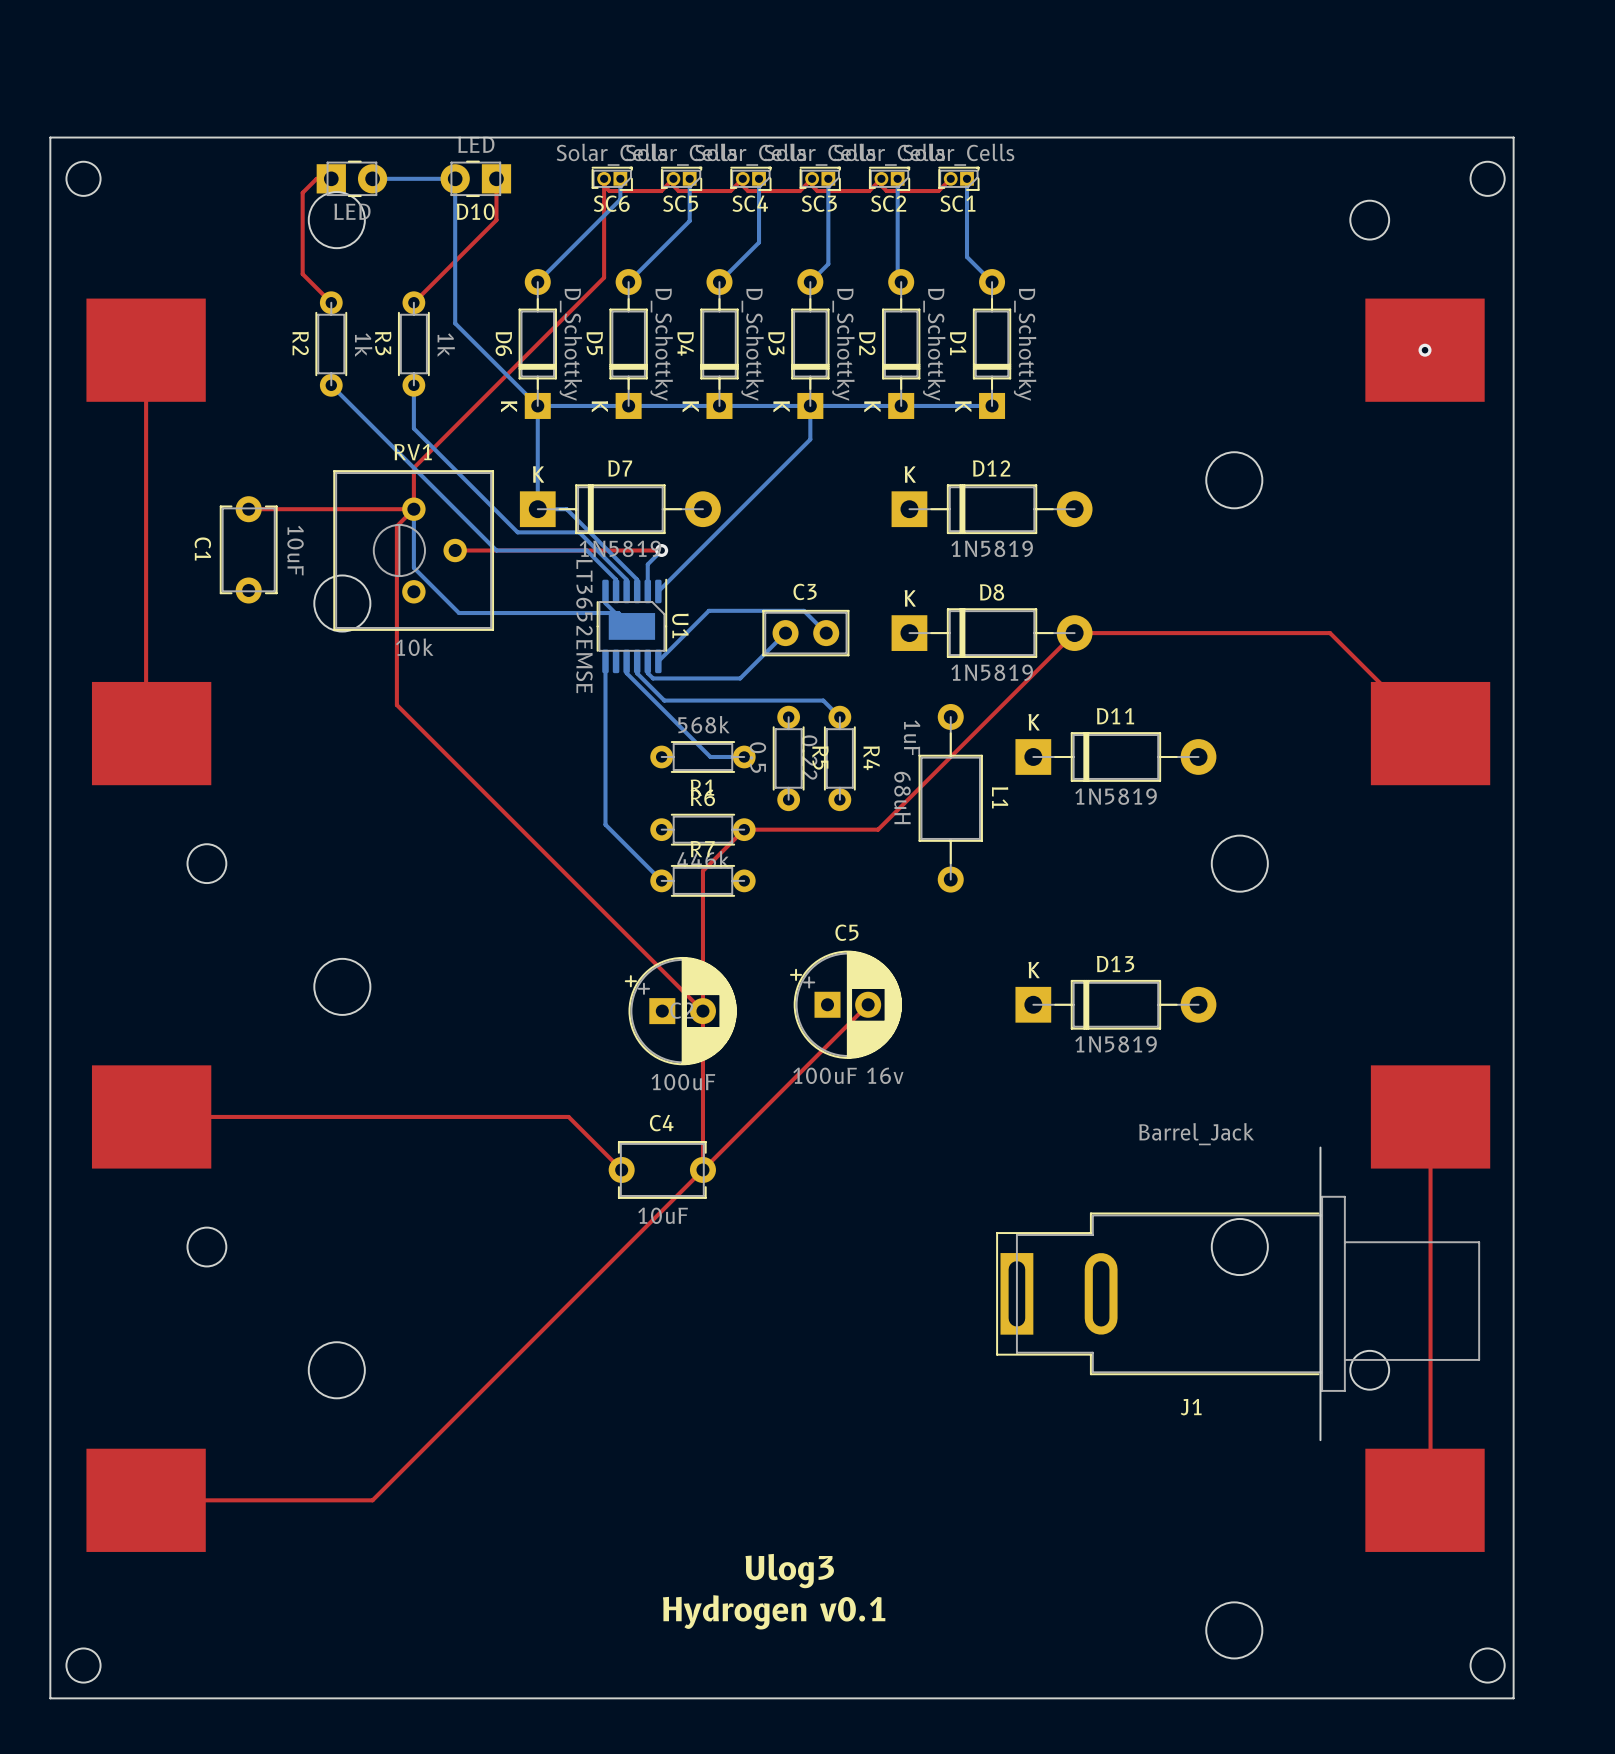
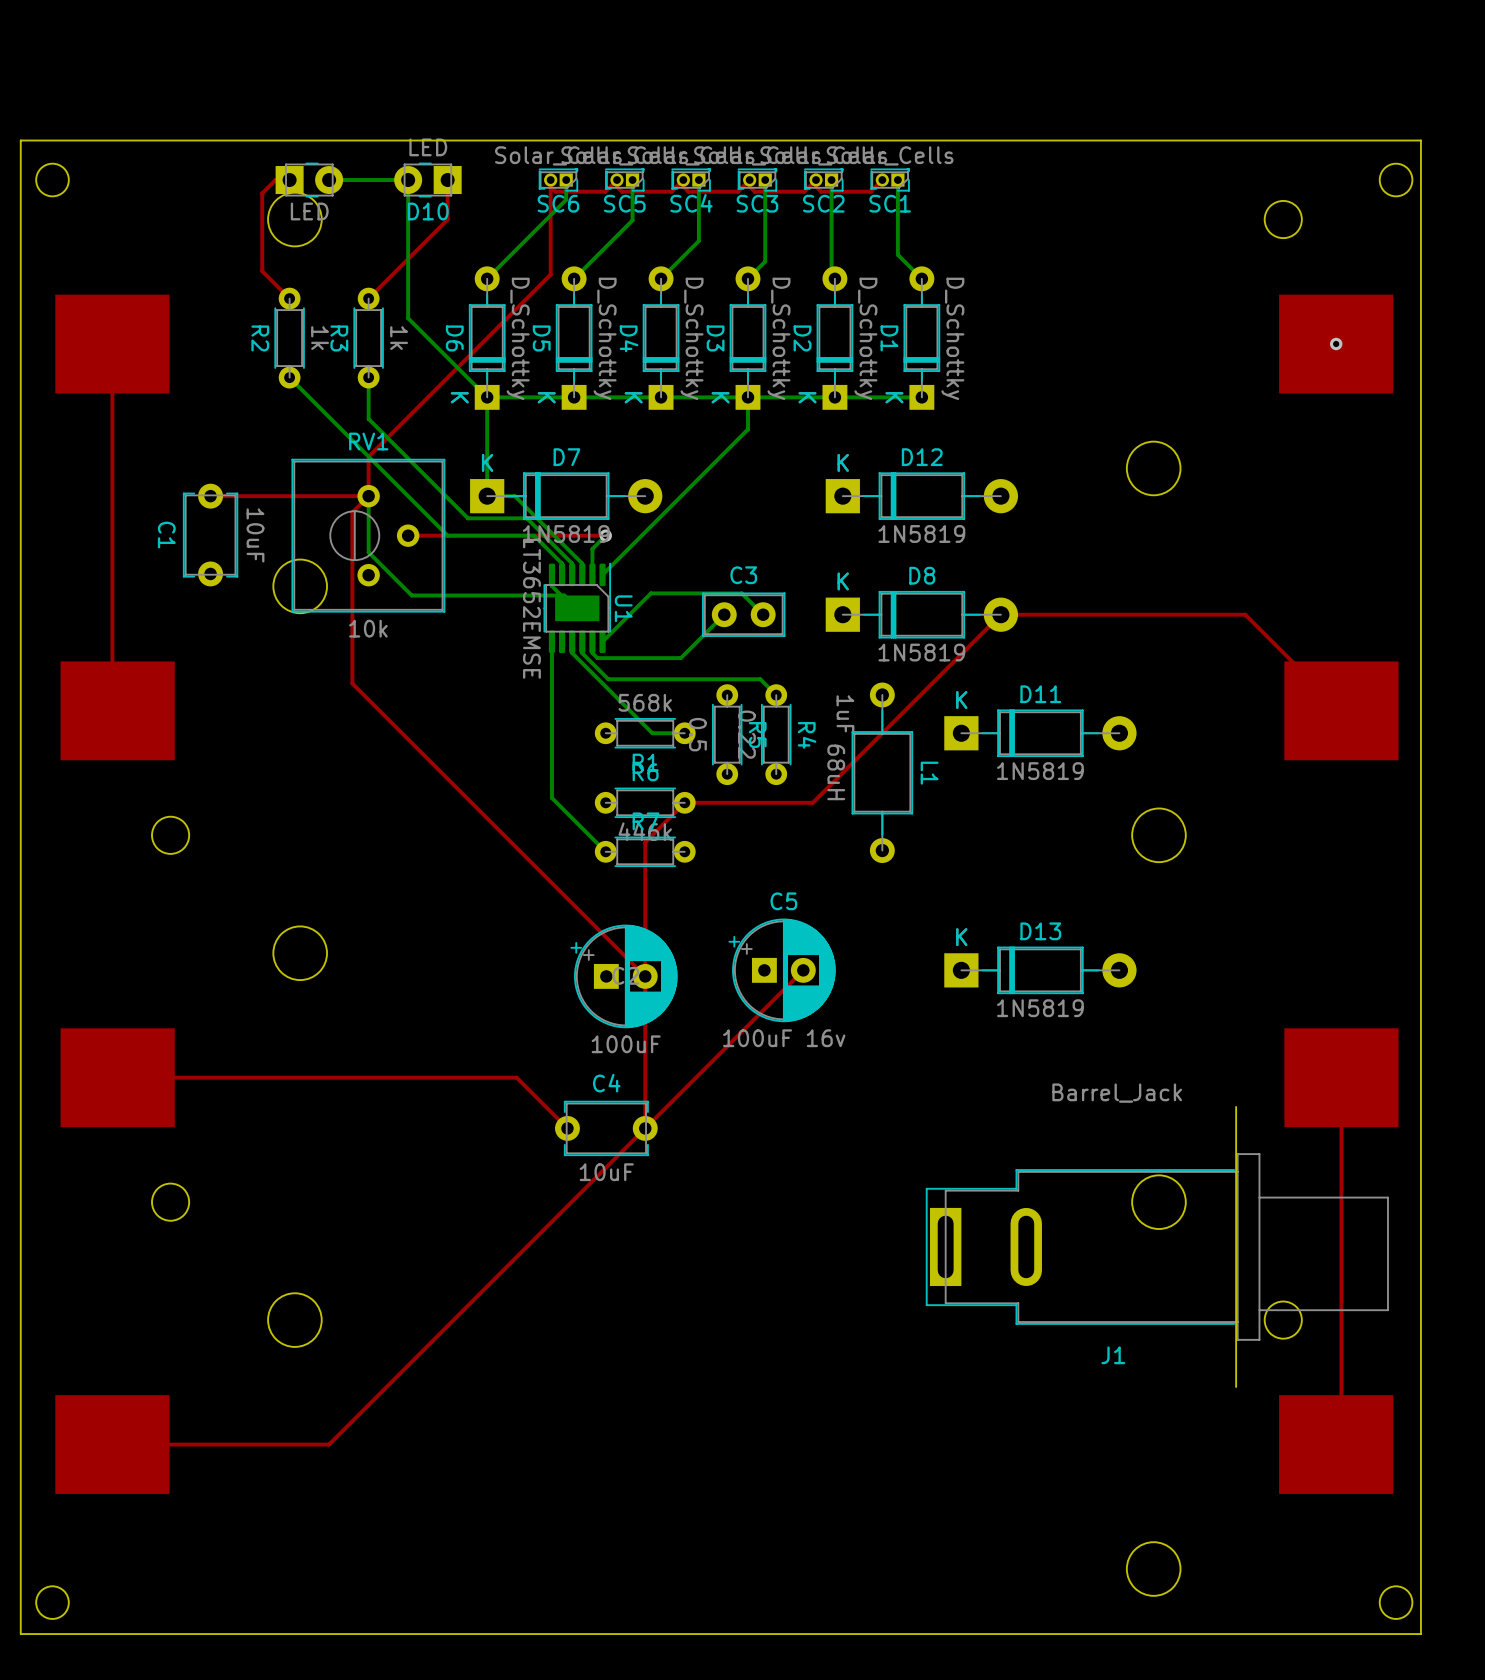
text: Ulog3 (789, 1571) -> none
text: Hydrogen v0.1 (774, 1612) -> none

